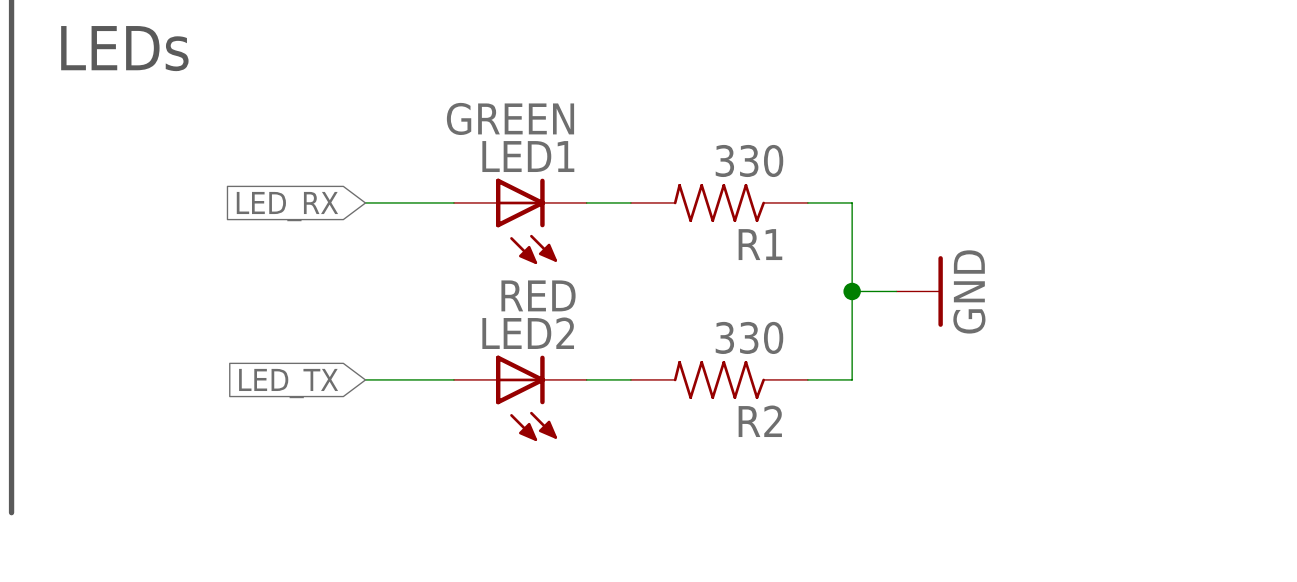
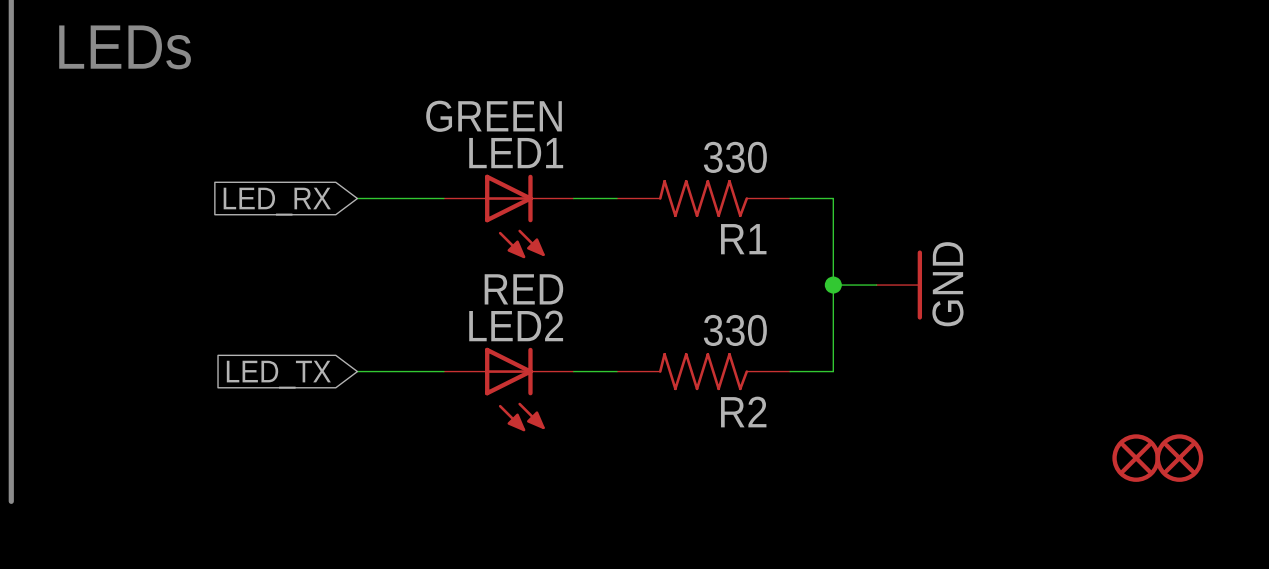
part: none -> (1136, 458)
part: none -> (1179, 458)

